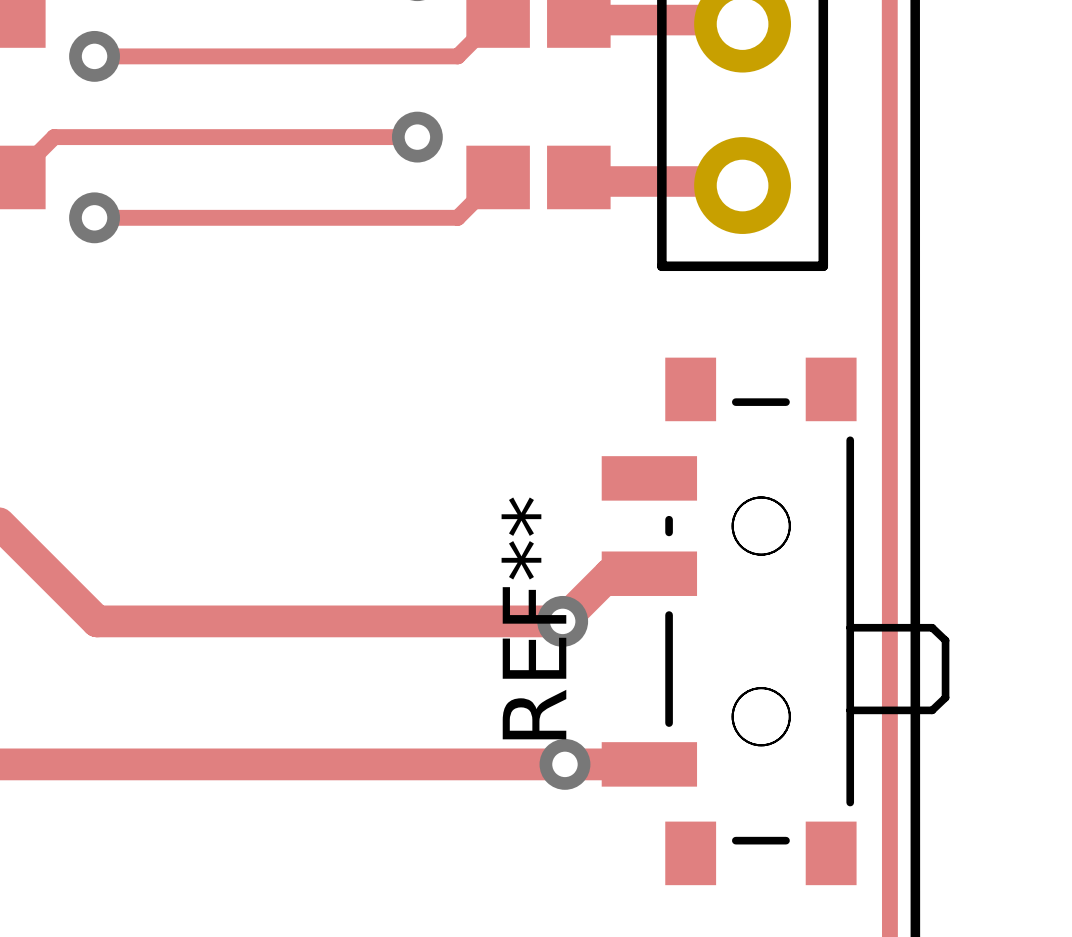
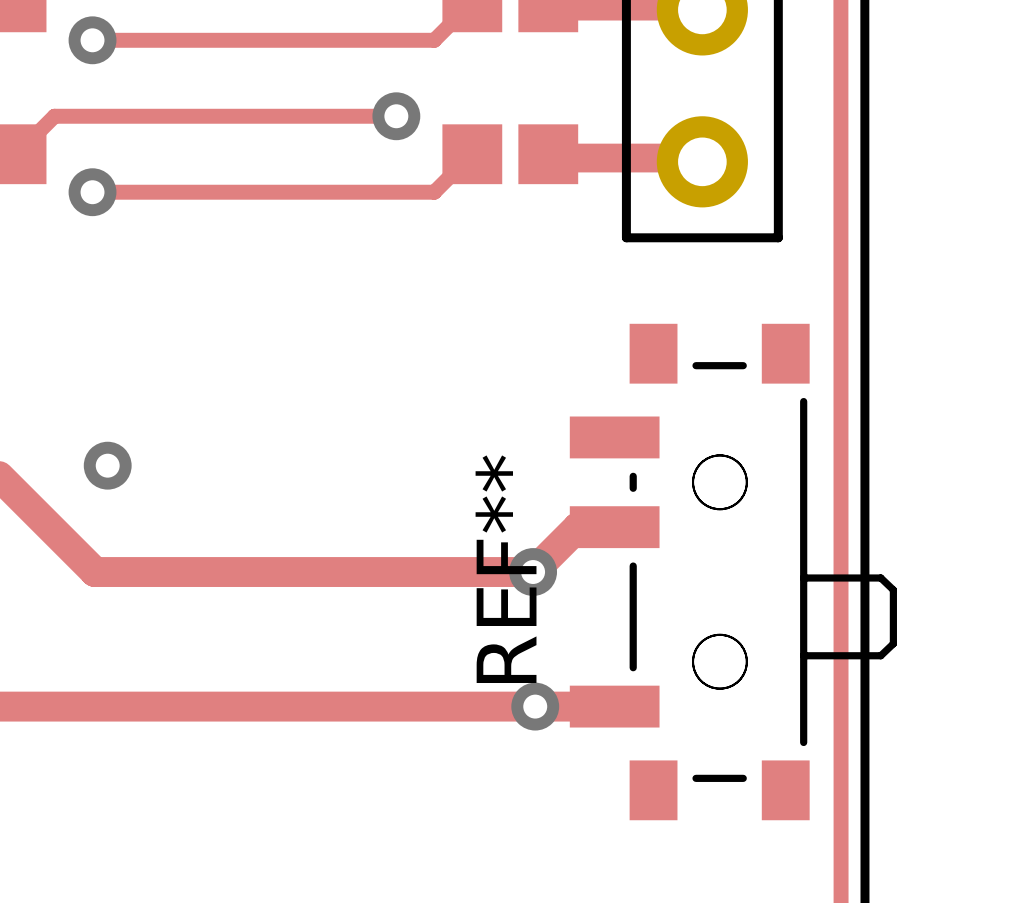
via: none -> (107, 465)

